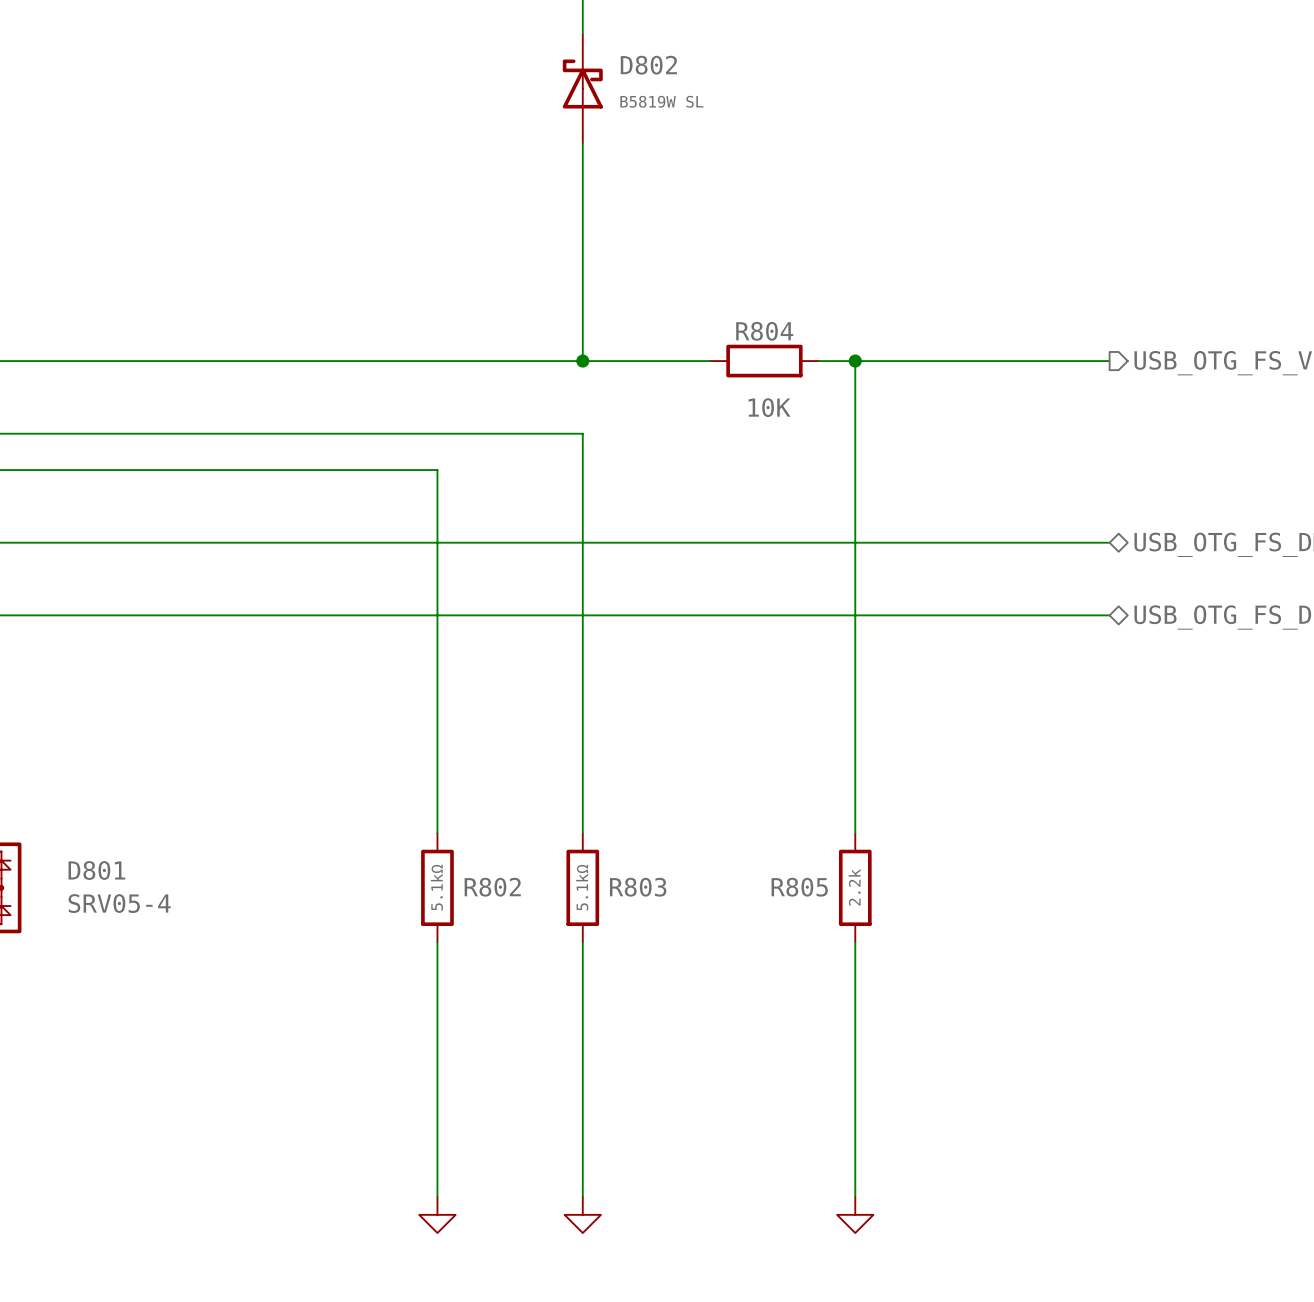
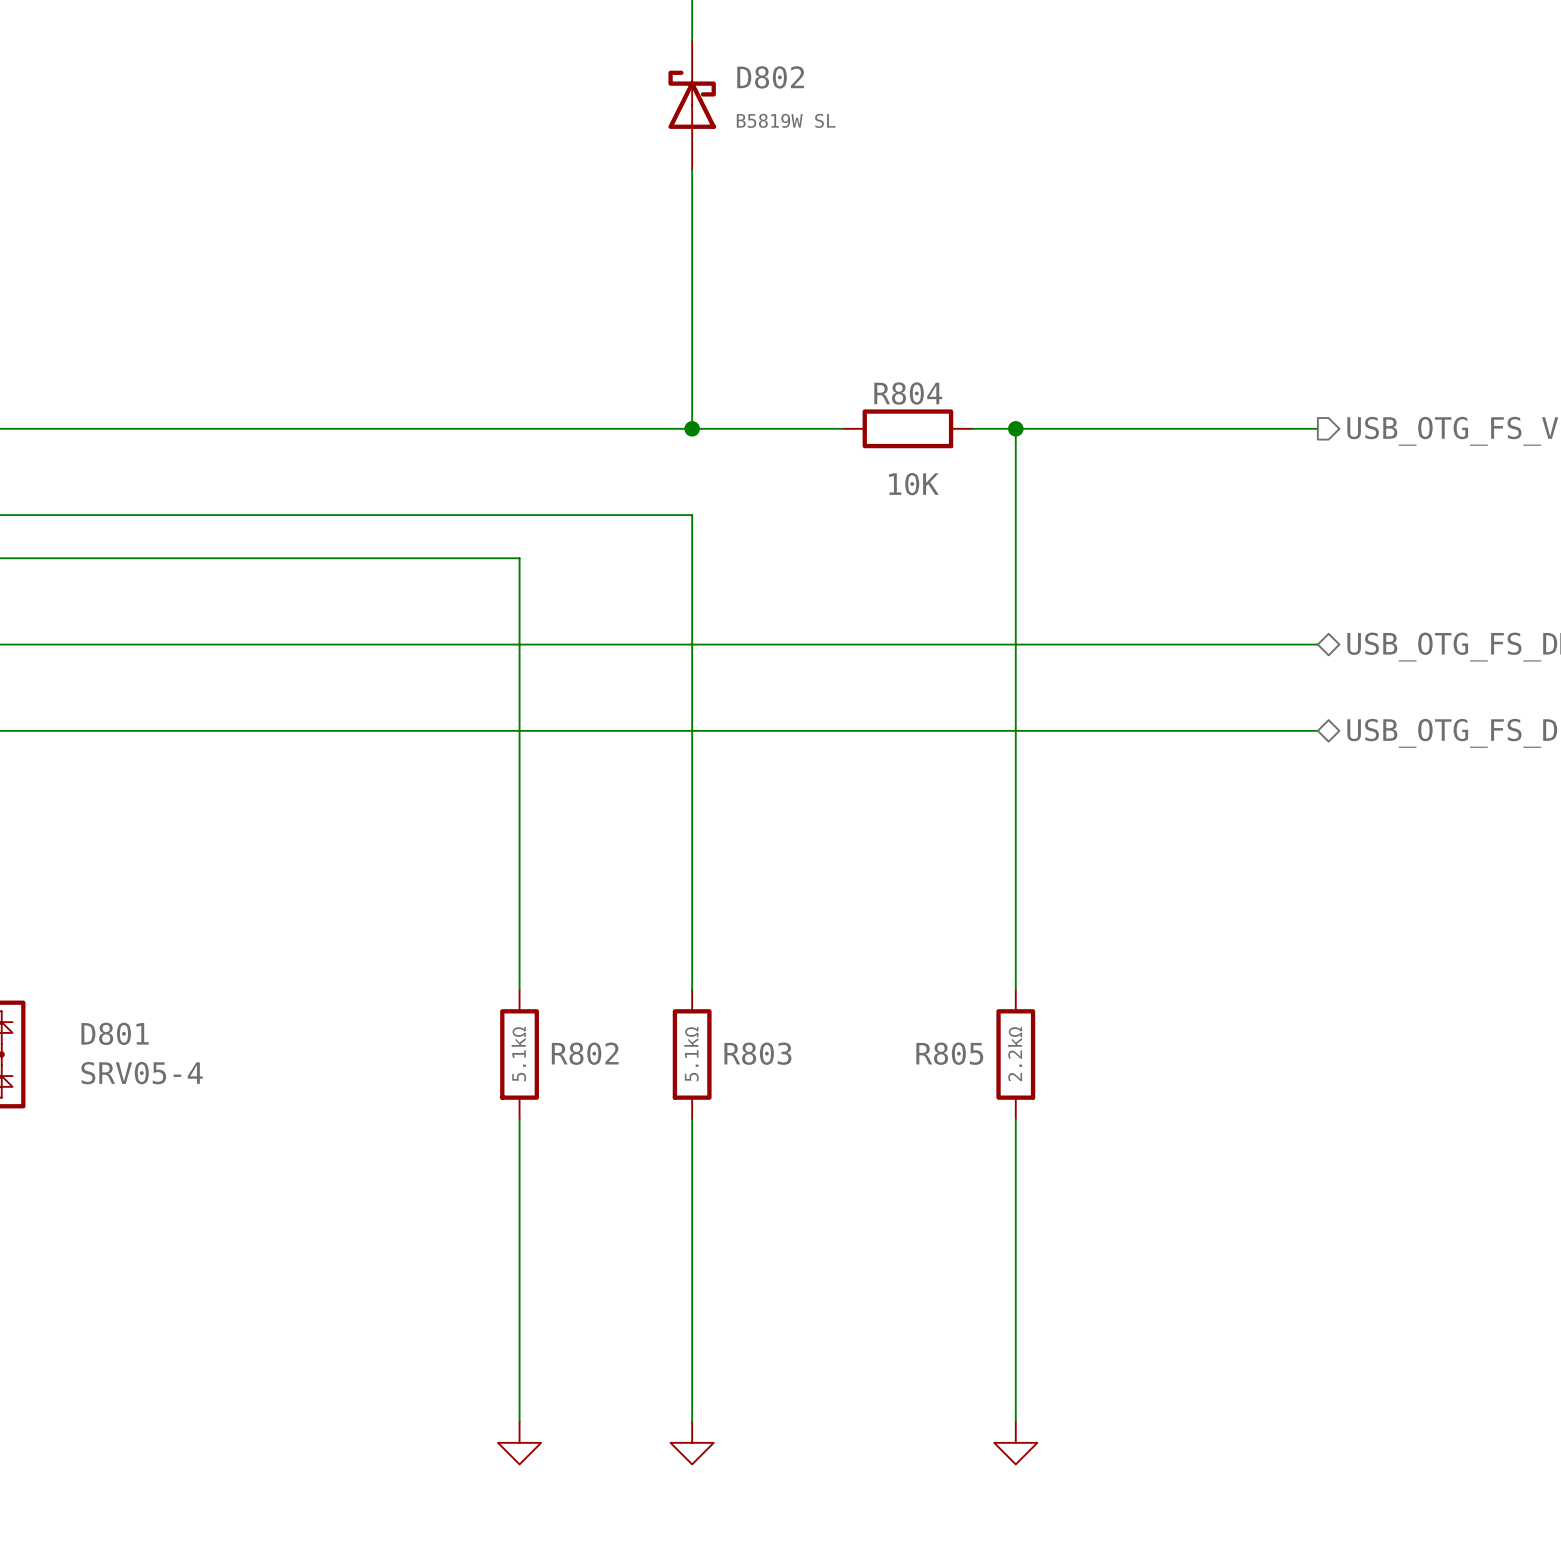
R805 value: 2.2k (854, 887) -> 2.2kΩ (1014, 1054)

